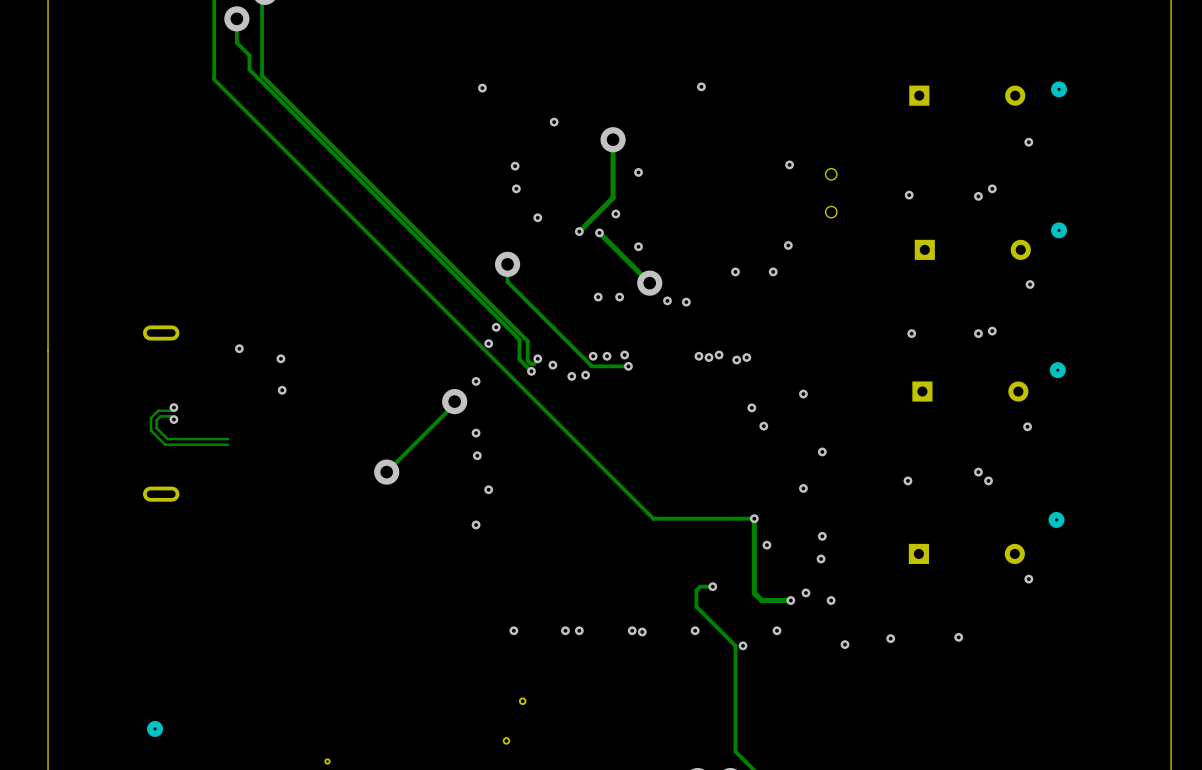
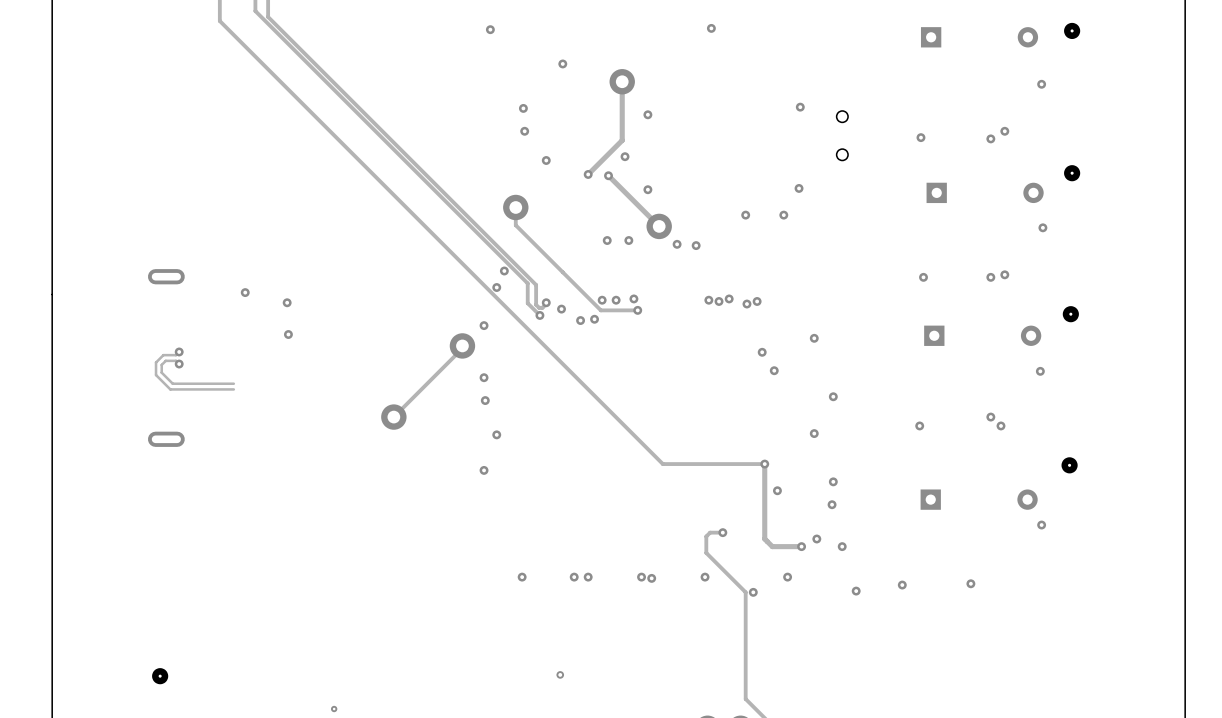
part: (522, 701) -> none
via: none -> (560, 674)
part: (506, 740) -> none

